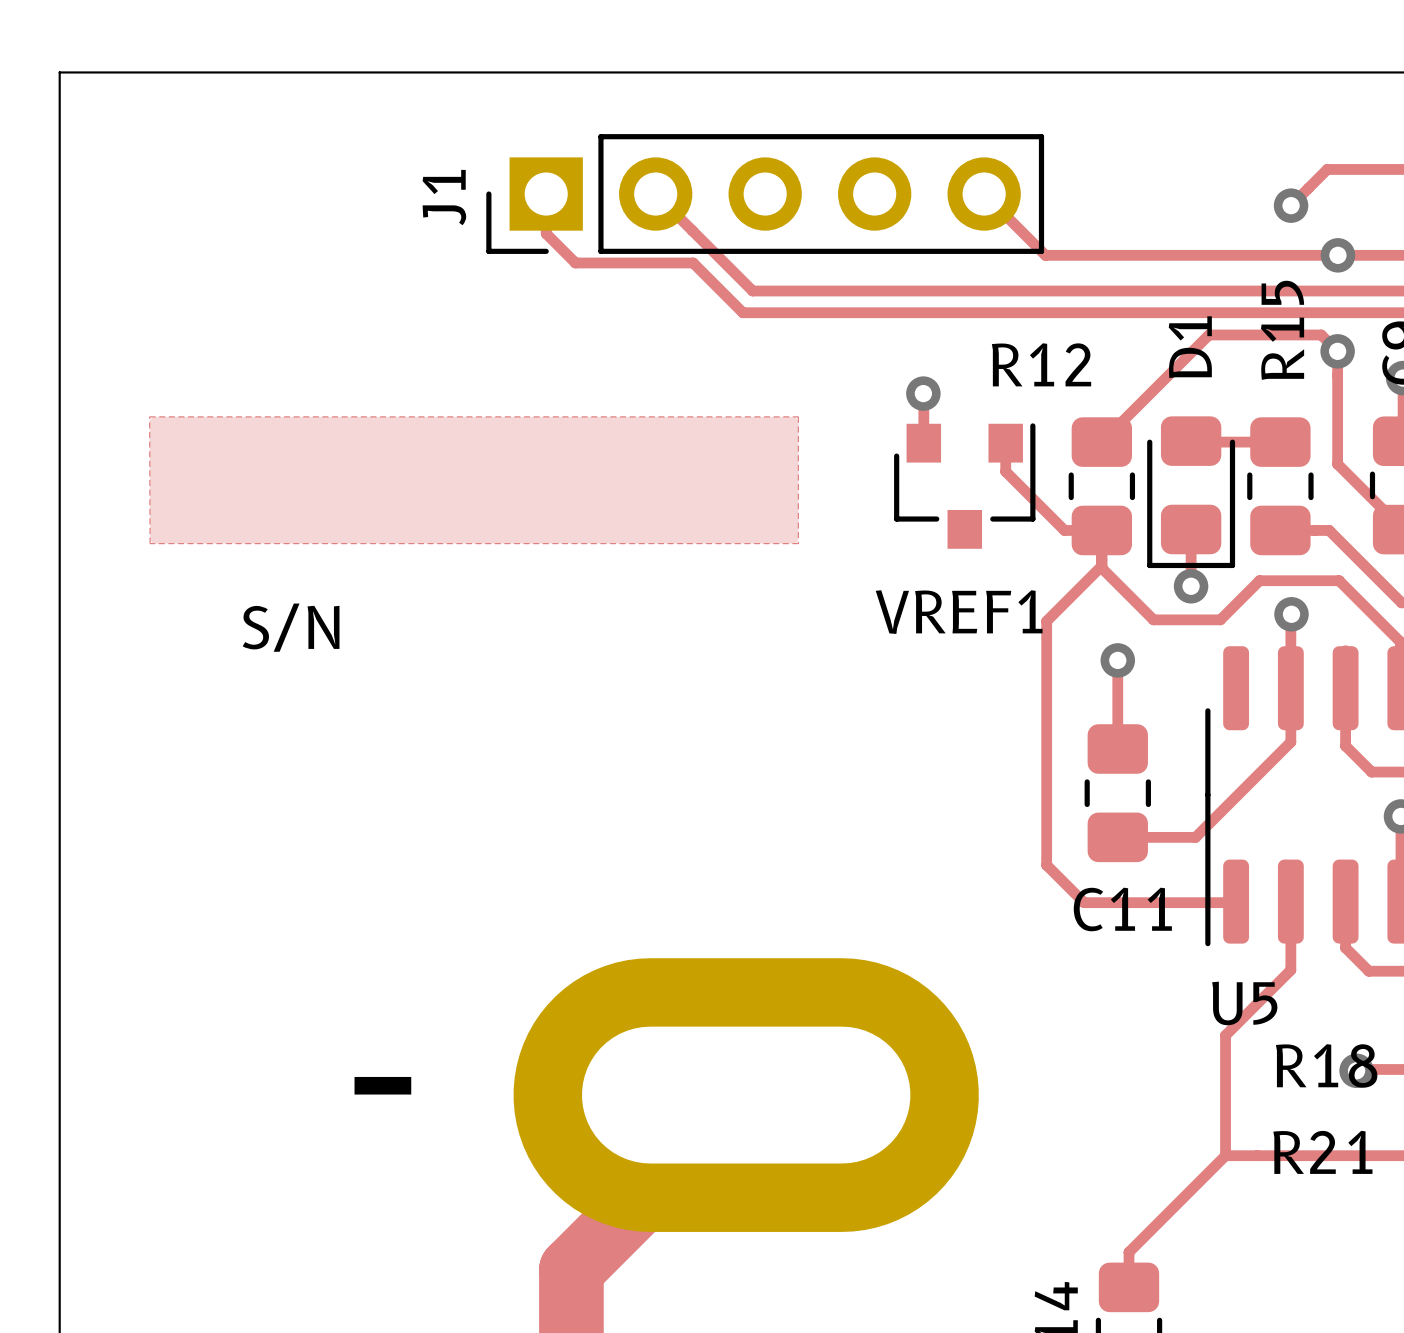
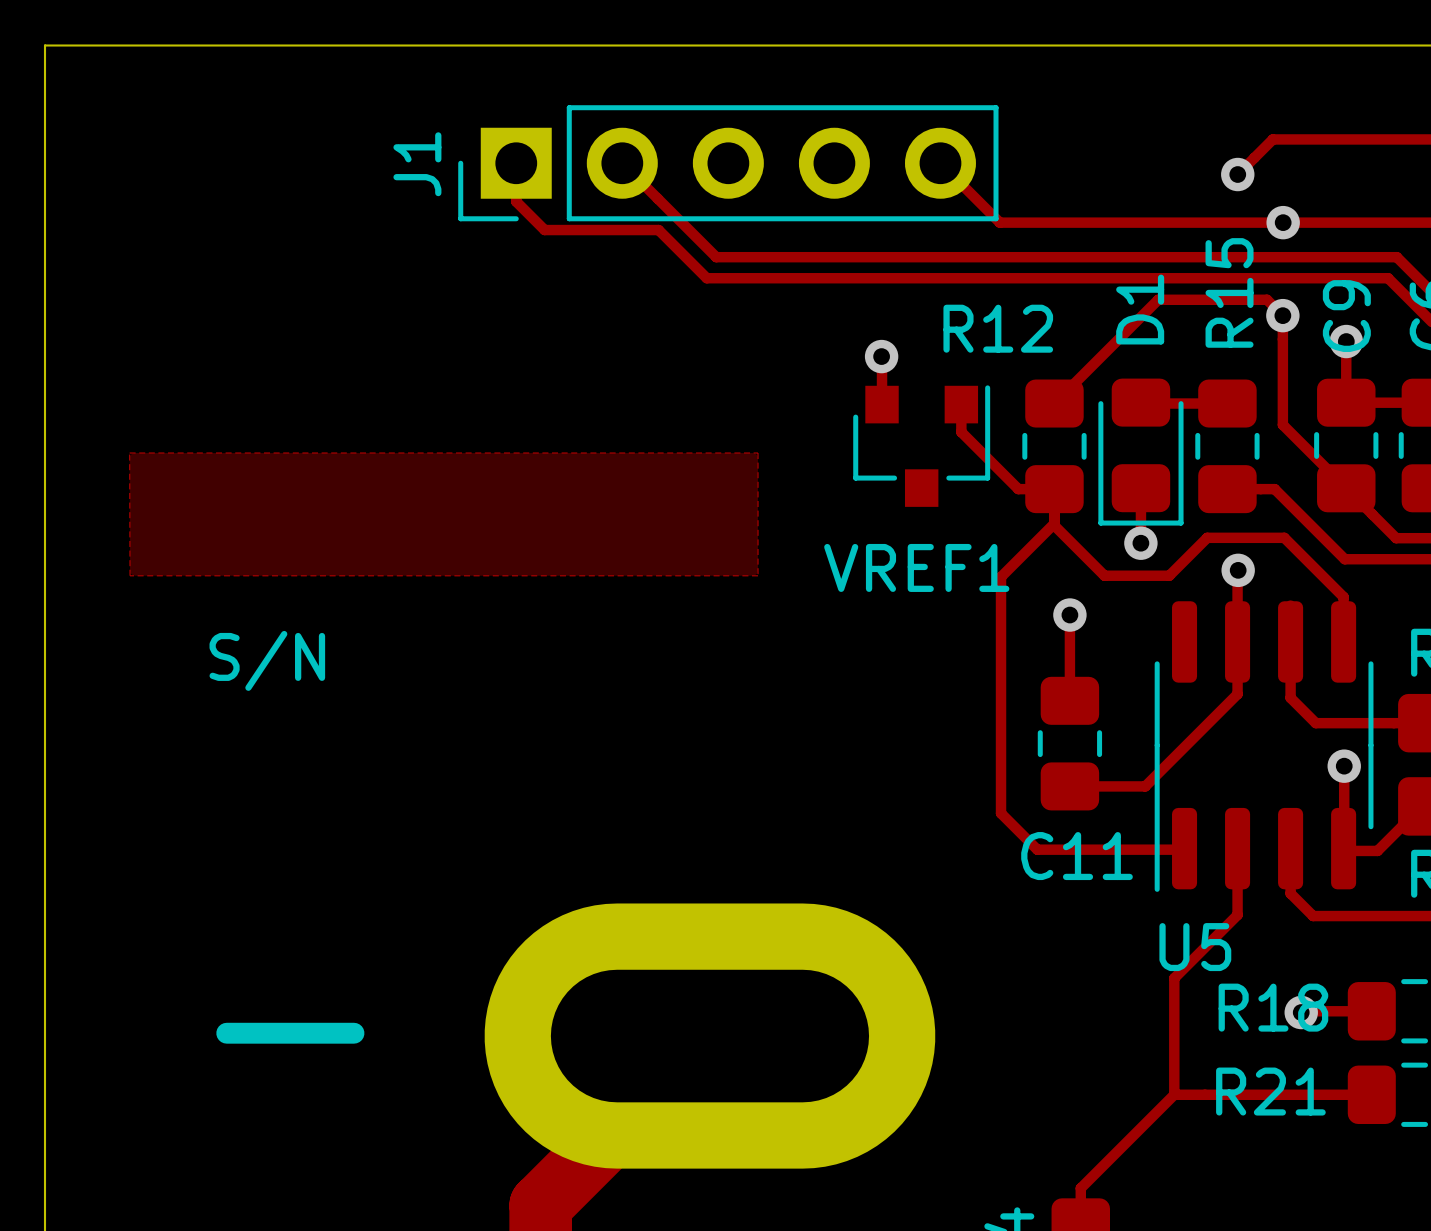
zone outline: (149, 416) (798, 416) (798, 543) (150, 543) (149, 416) -> (129, 453) (758, 453) (758, 575) (130, 575) (129, 453)
text position: S/N (291, 627) -> S/N (267, 660)

